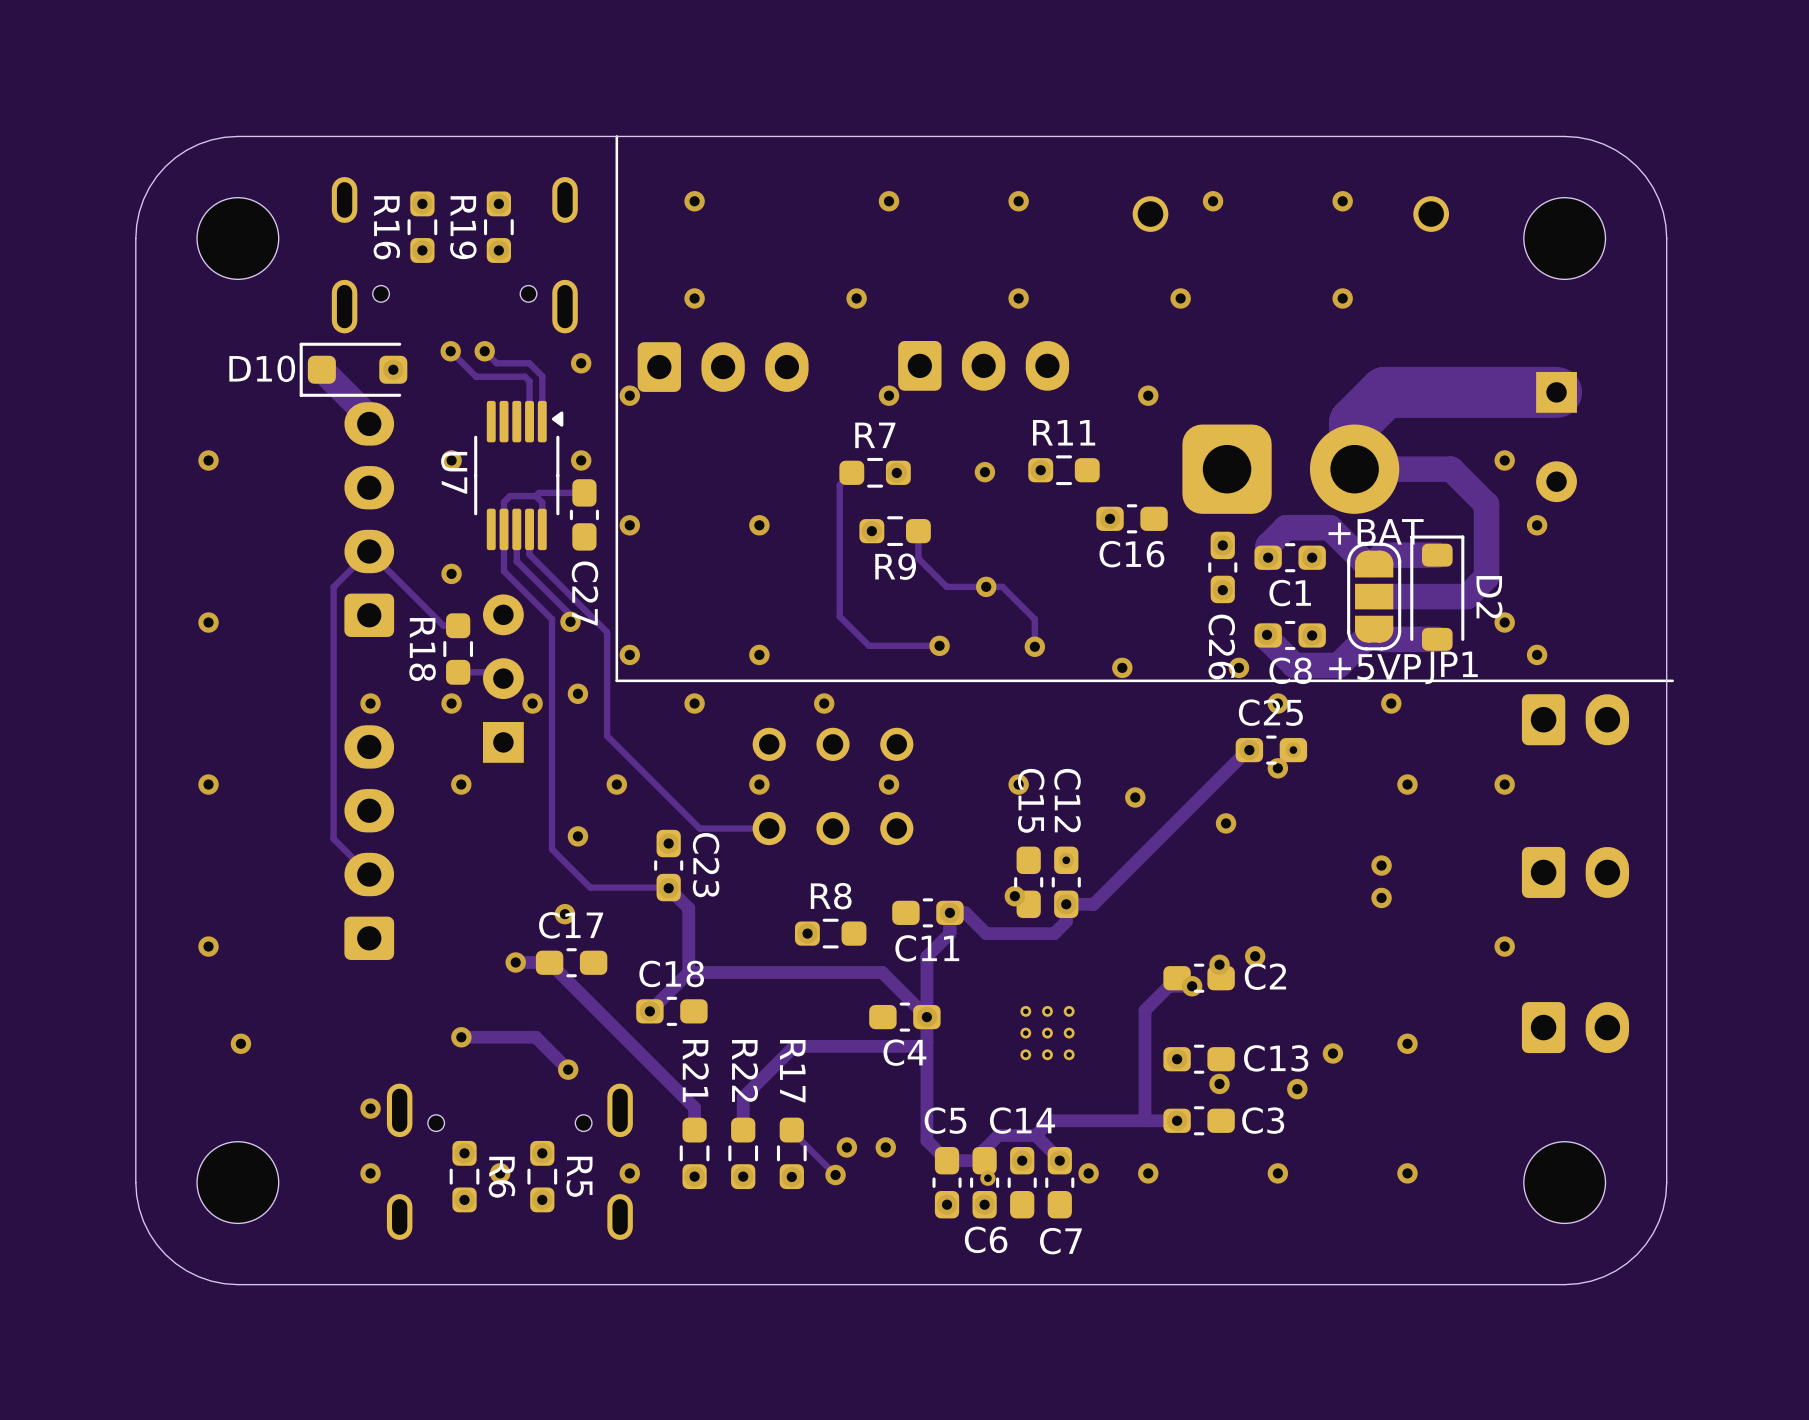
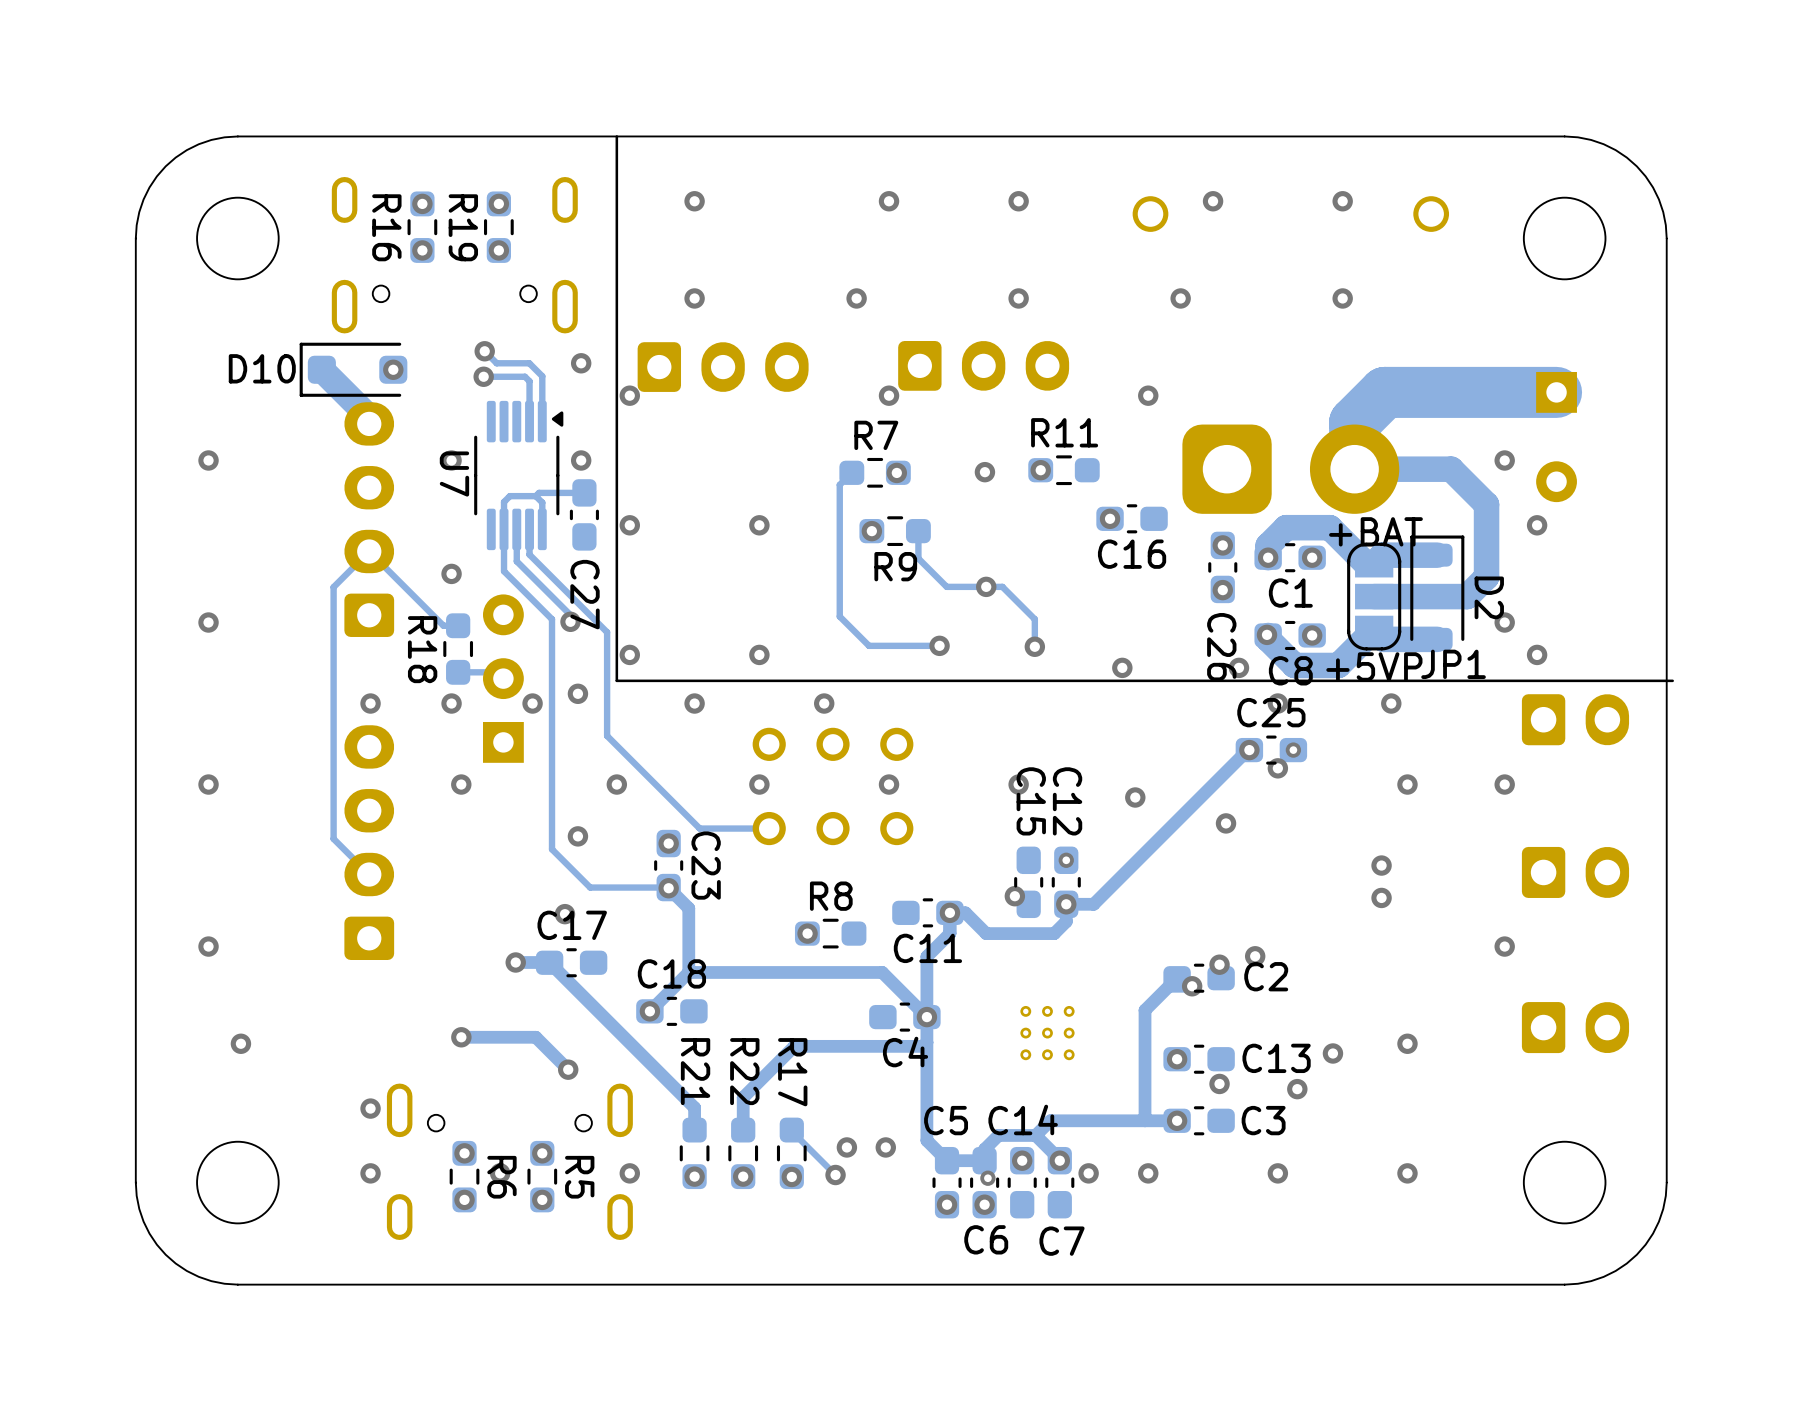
track: (450, 351) (476, 376) (483, 376) -> none
via position: (450, 351) -> (483, 376)

